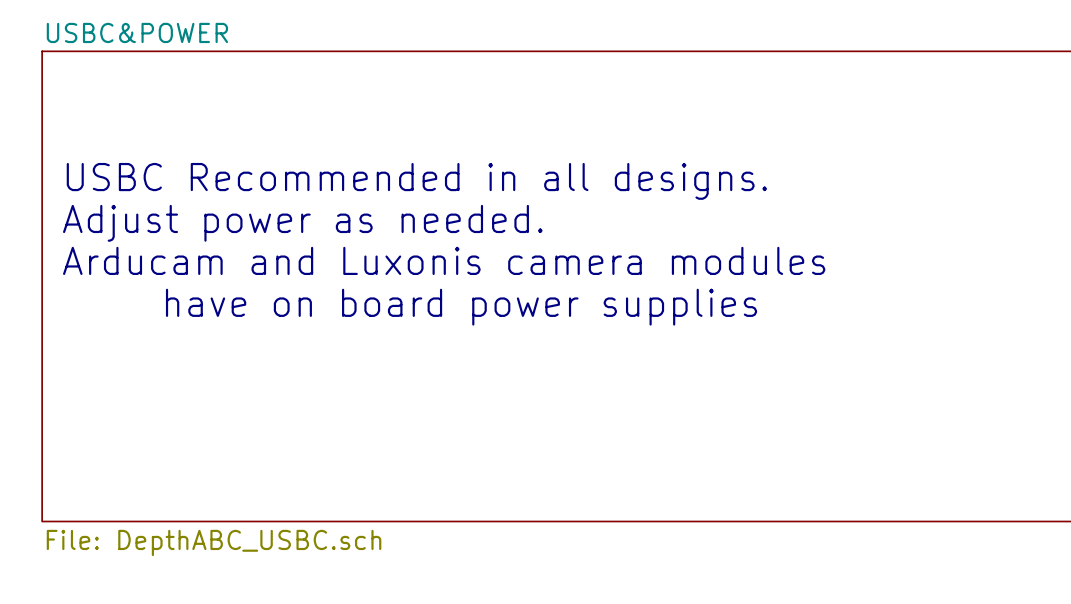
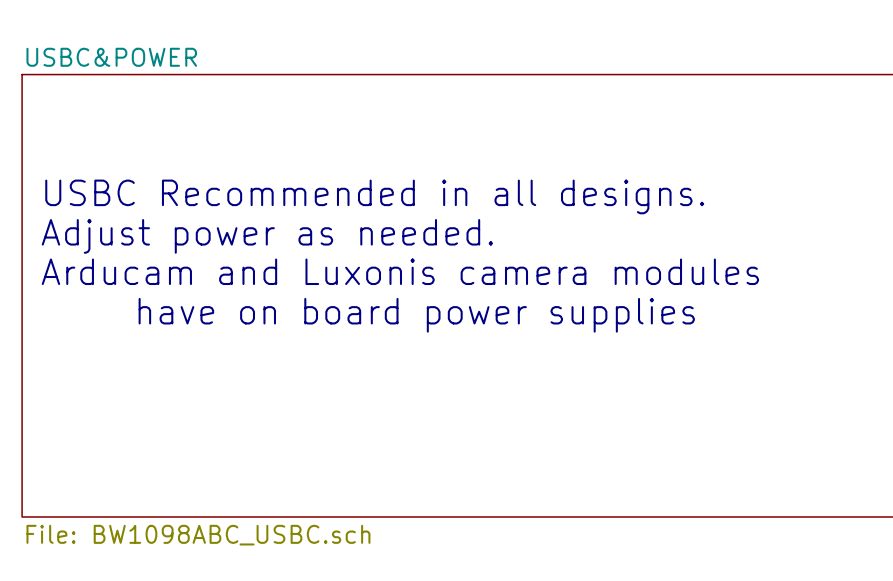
sheet USBC&POWER value: File: DepthABC_USBC.sch (214, 542) -> File: BW1098ABC_USBC.sch (198, 535)

